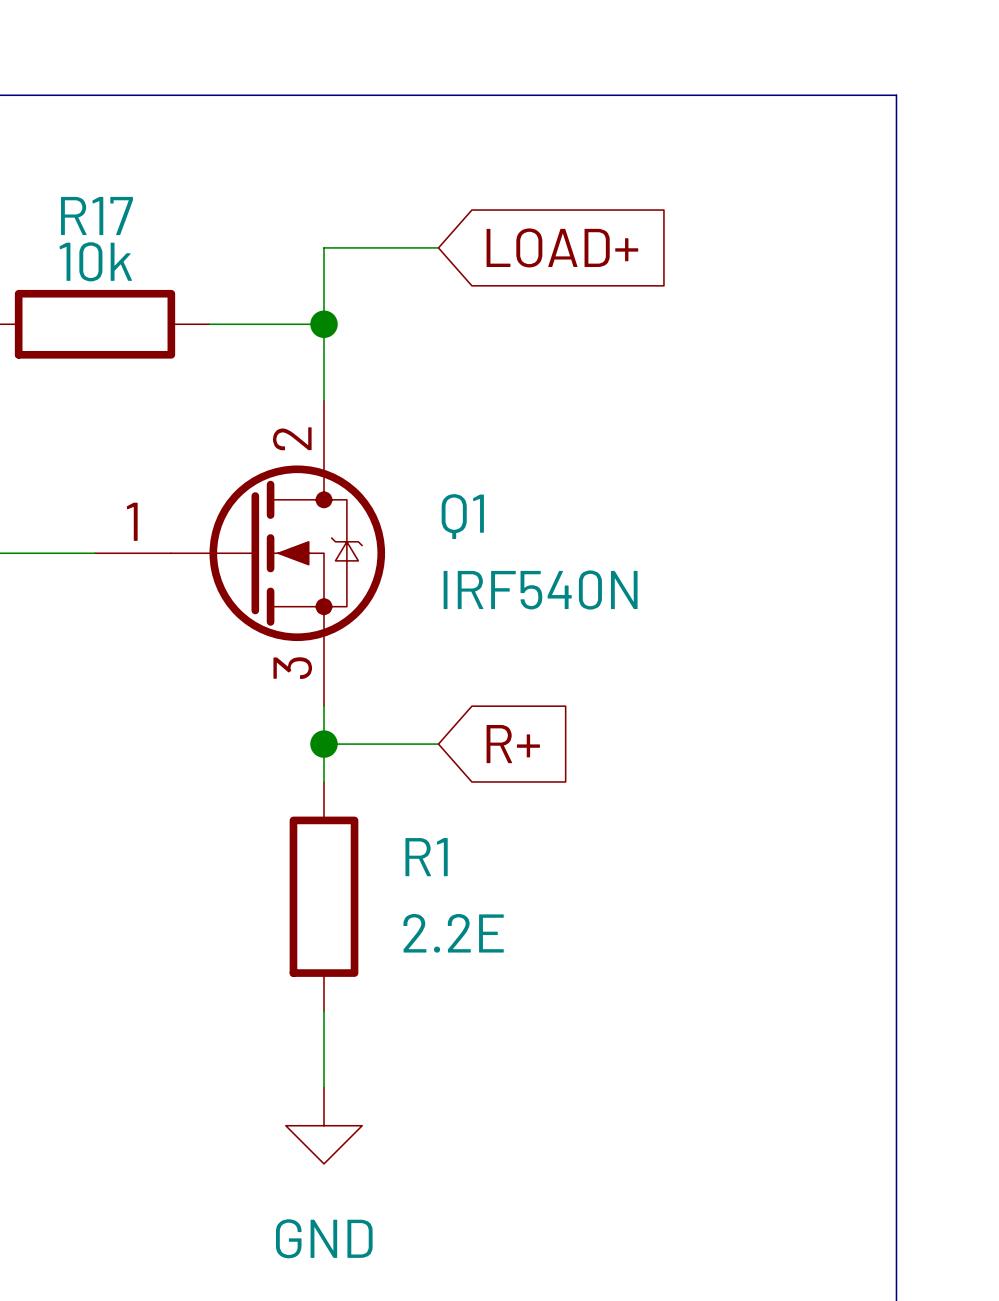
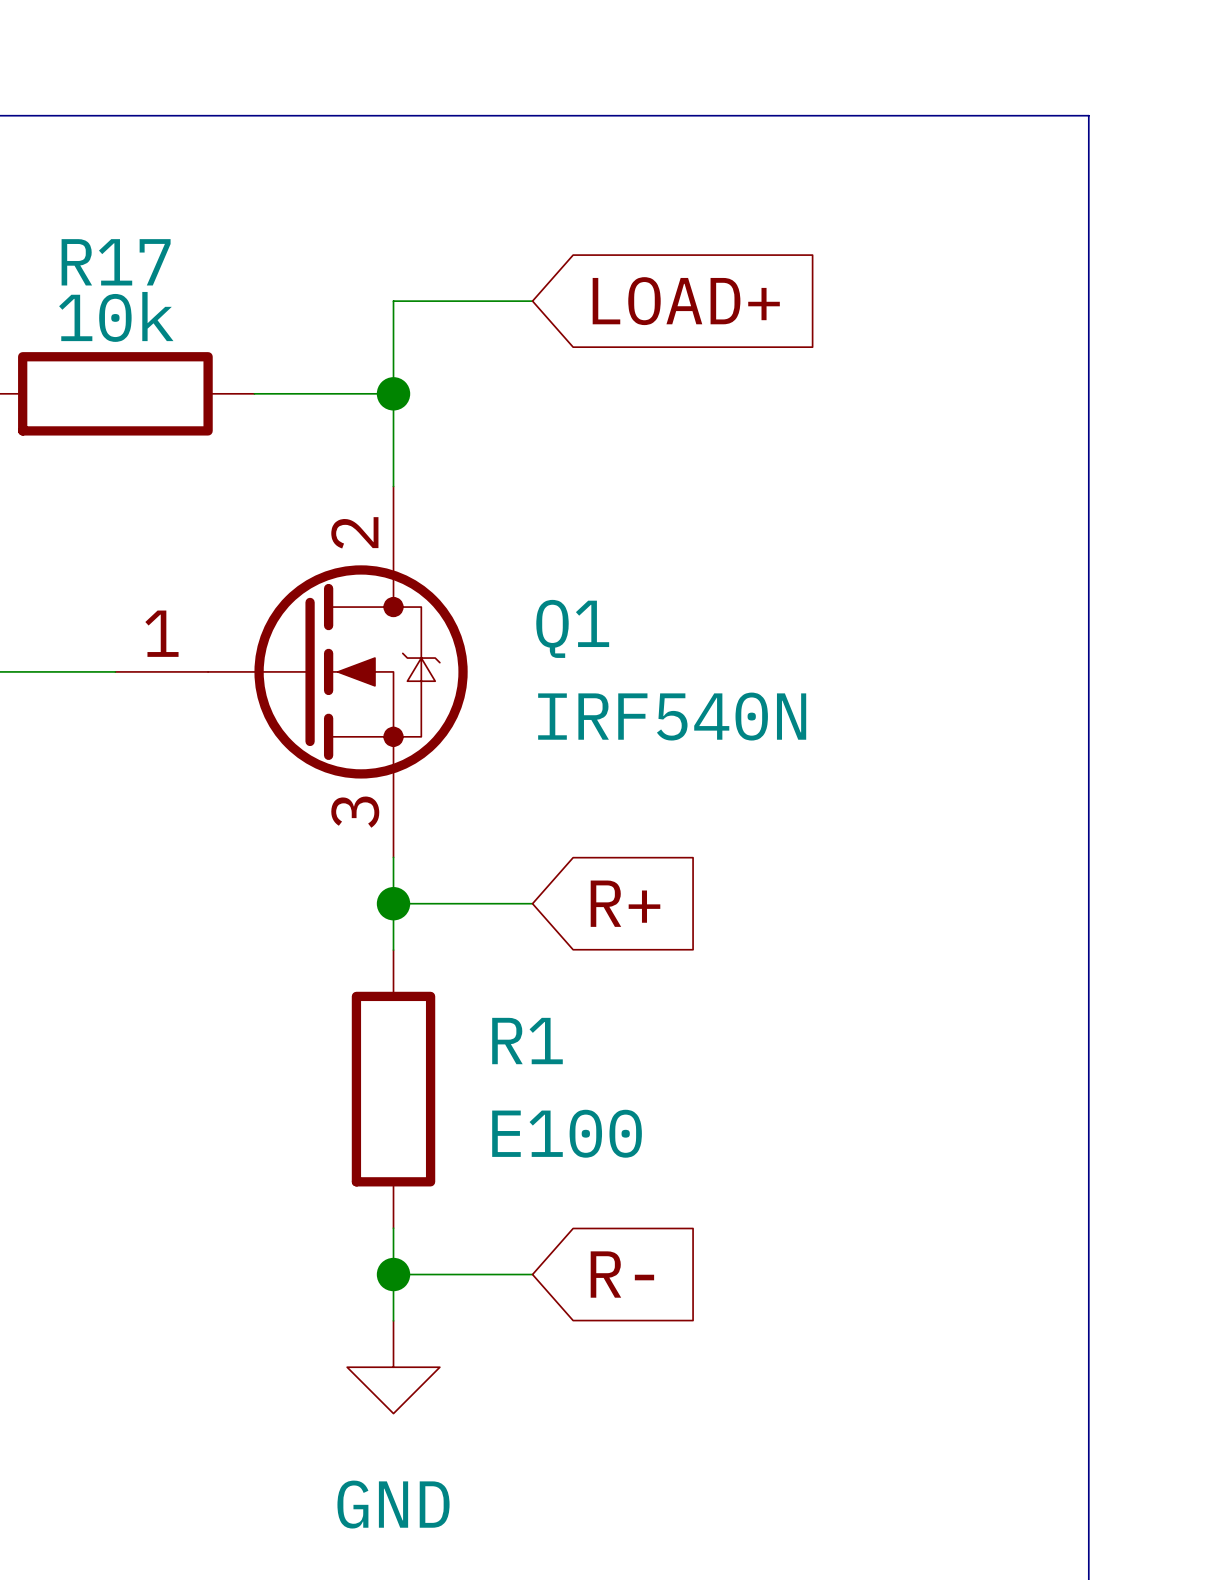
R1 value: 2.2E (453, 933) -> E100 (567, 1133)
wire: none -> (393, 1274) (532, 1274)
junction: none -> (393, 1274)
global label: none -> R- (622, 1274)

